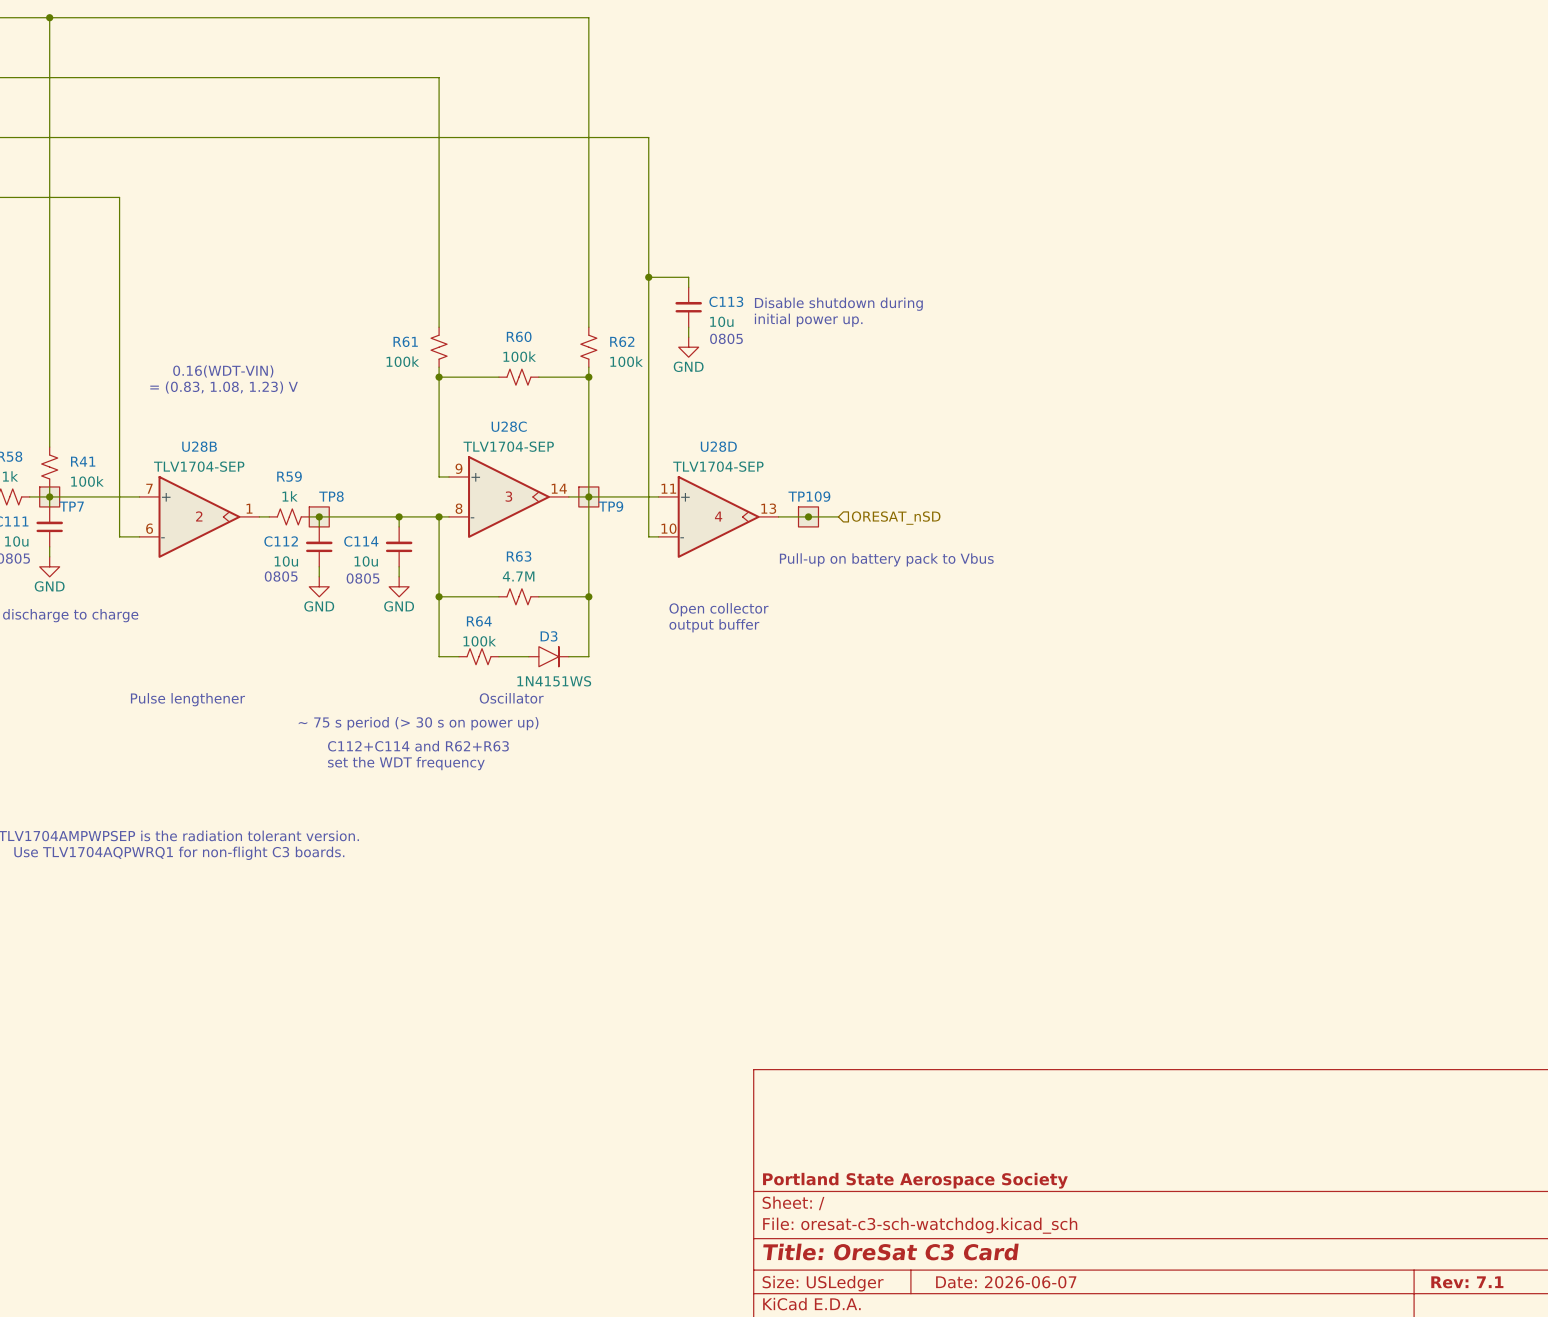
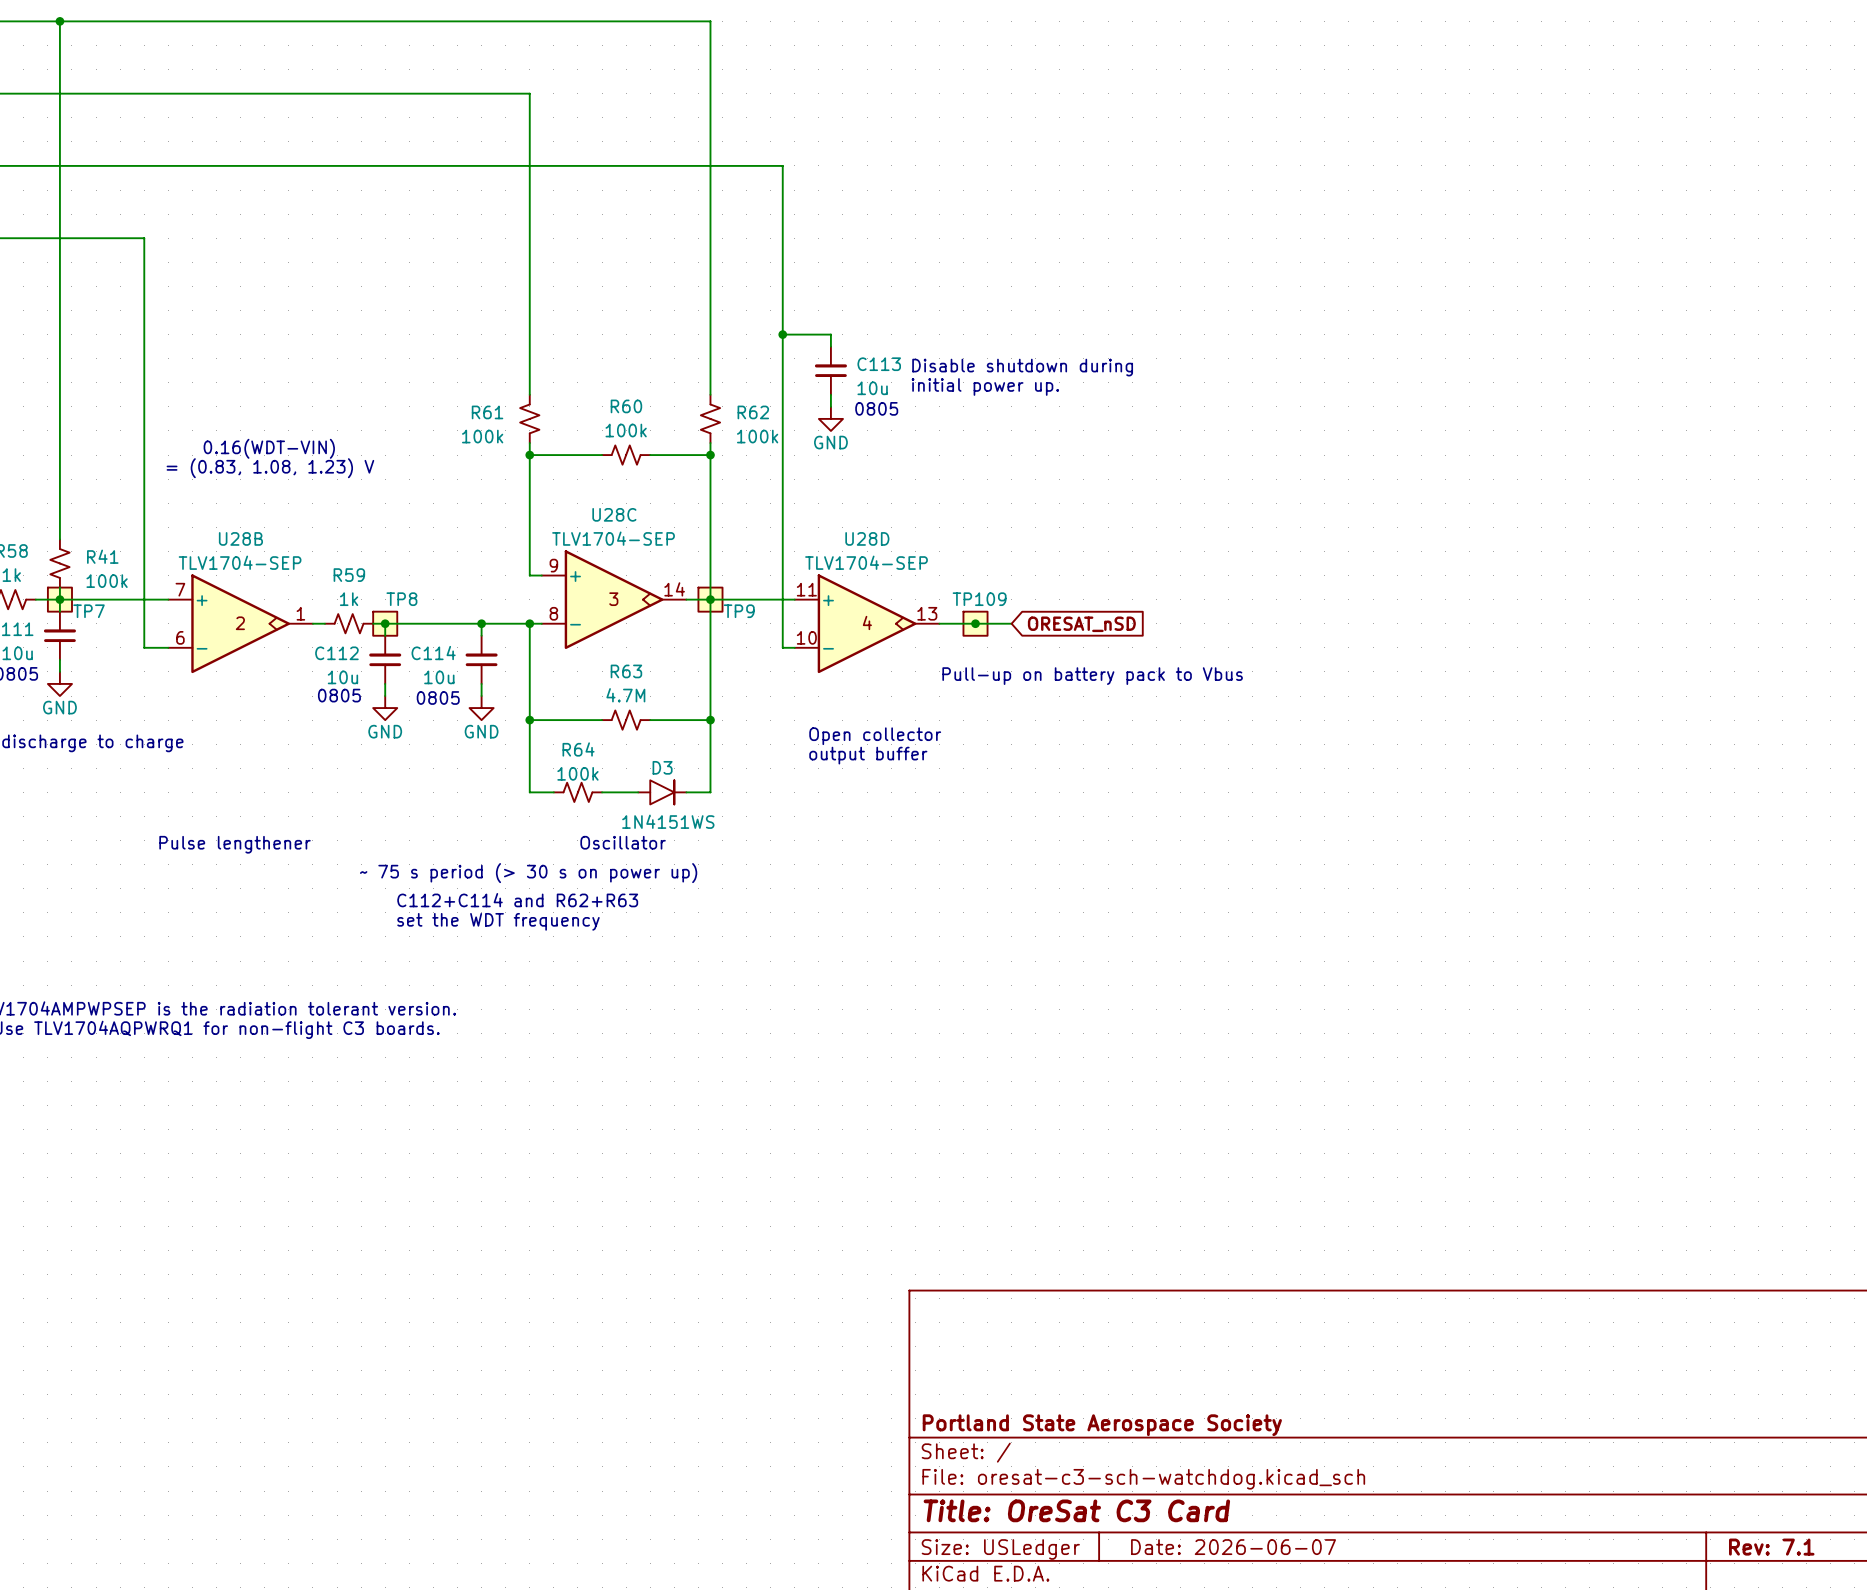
hierarchical label: ORESAT_nSD (896, 518) -> none
global label: none -> ORESAT_nSD (1081, 624)

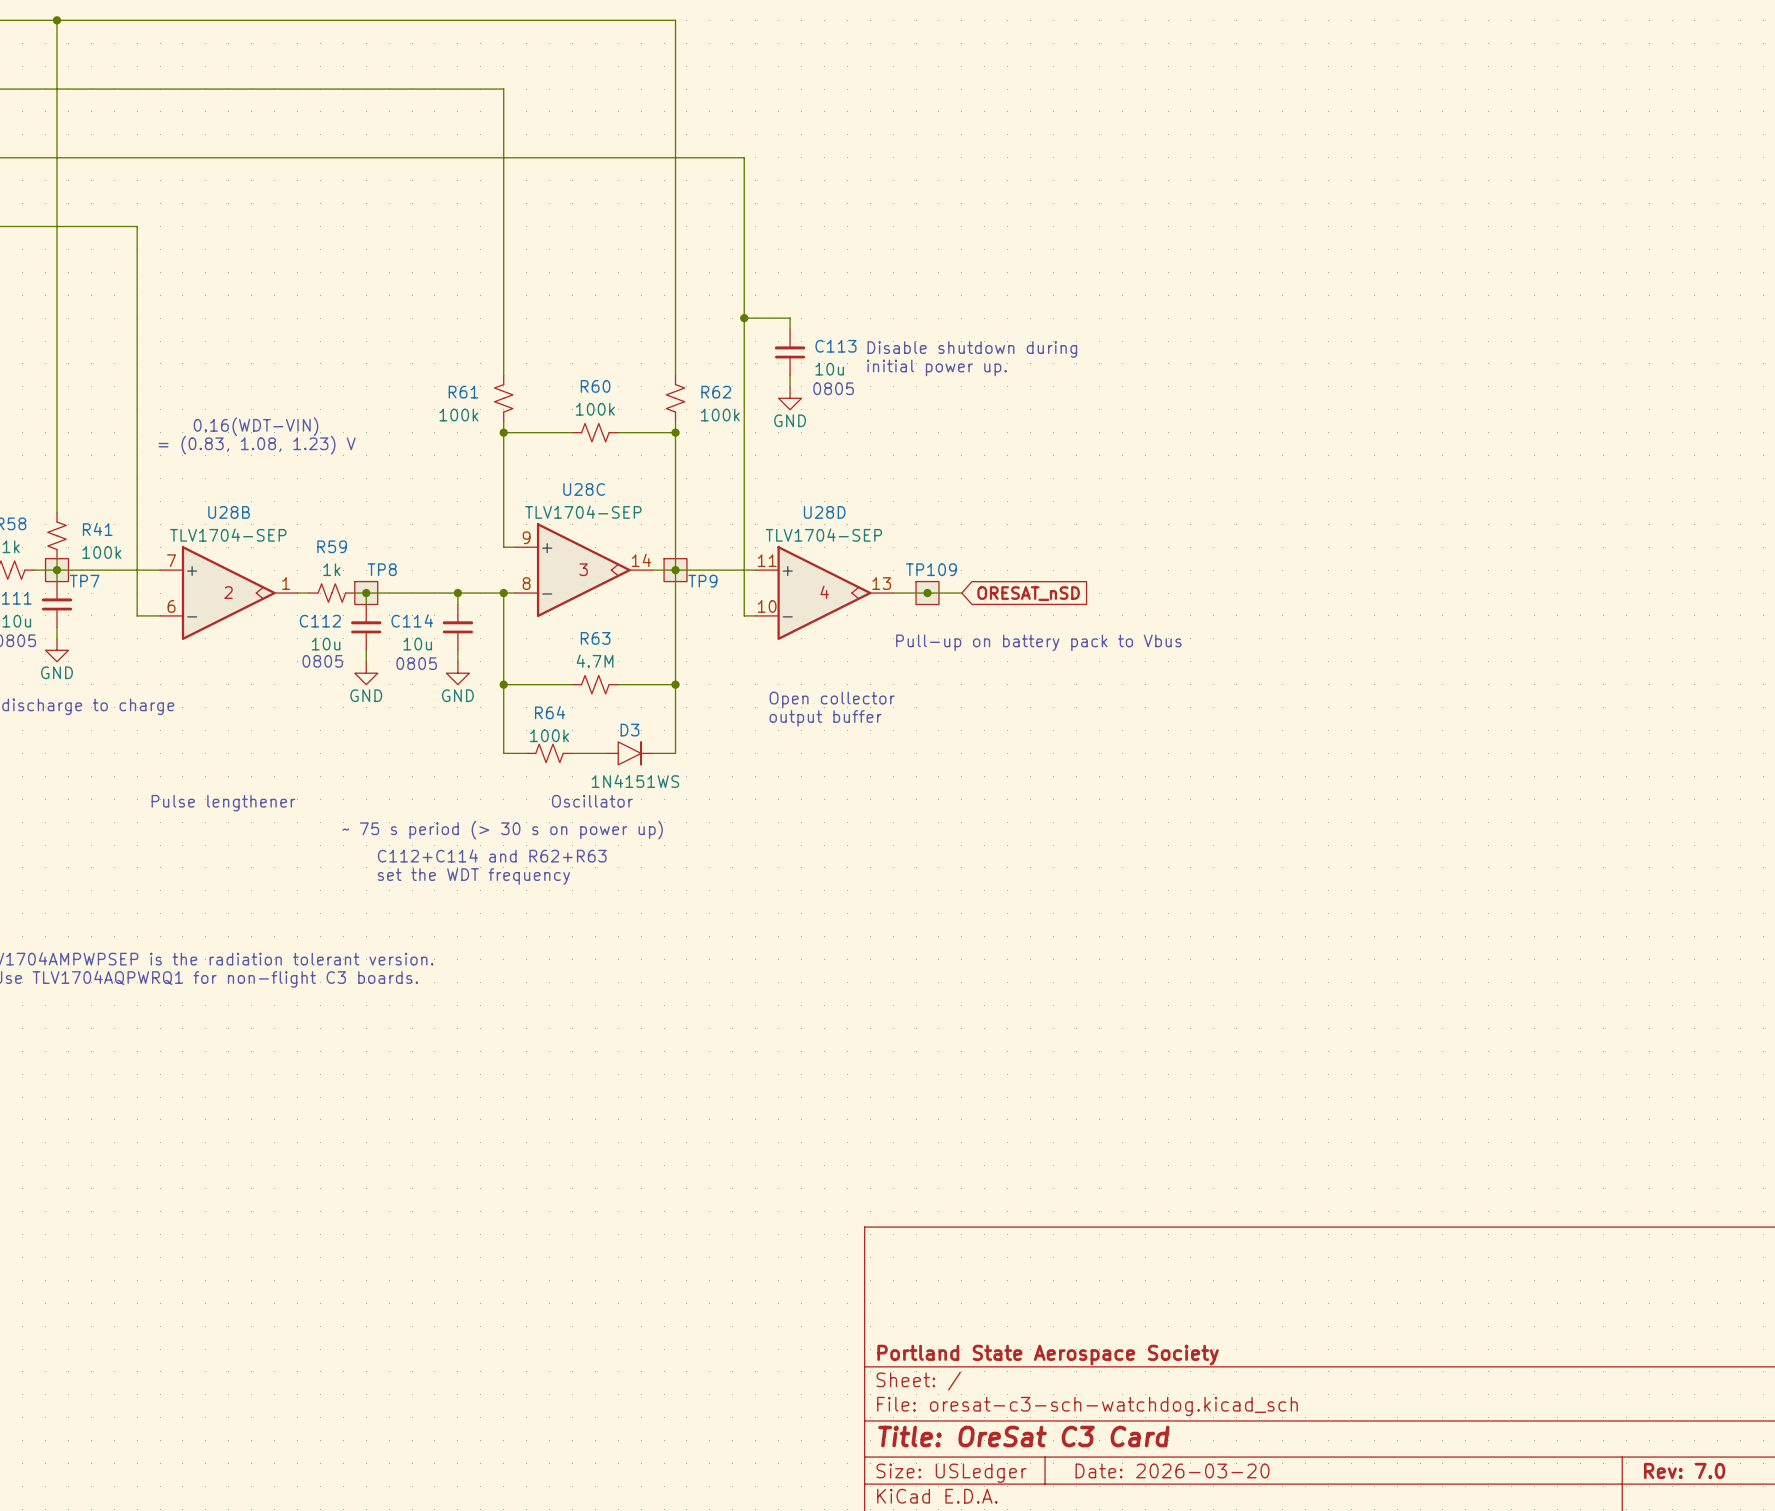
title block: Date: 2026-06-07 (1233, 1547) -> Date: 2026-03-20 (1172, 1470)
title block: Rev: 7.1 (1771, 1547) -> Rev: 7.0 (1684, 1470)

